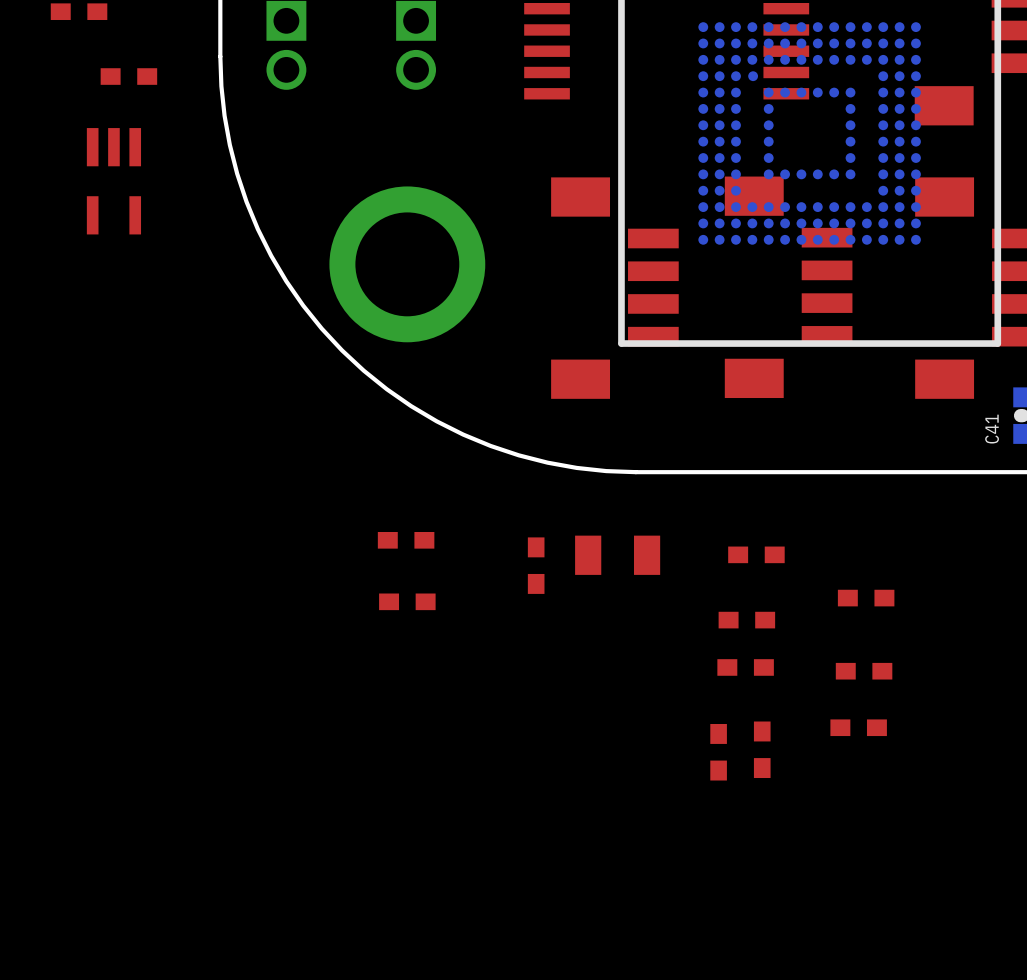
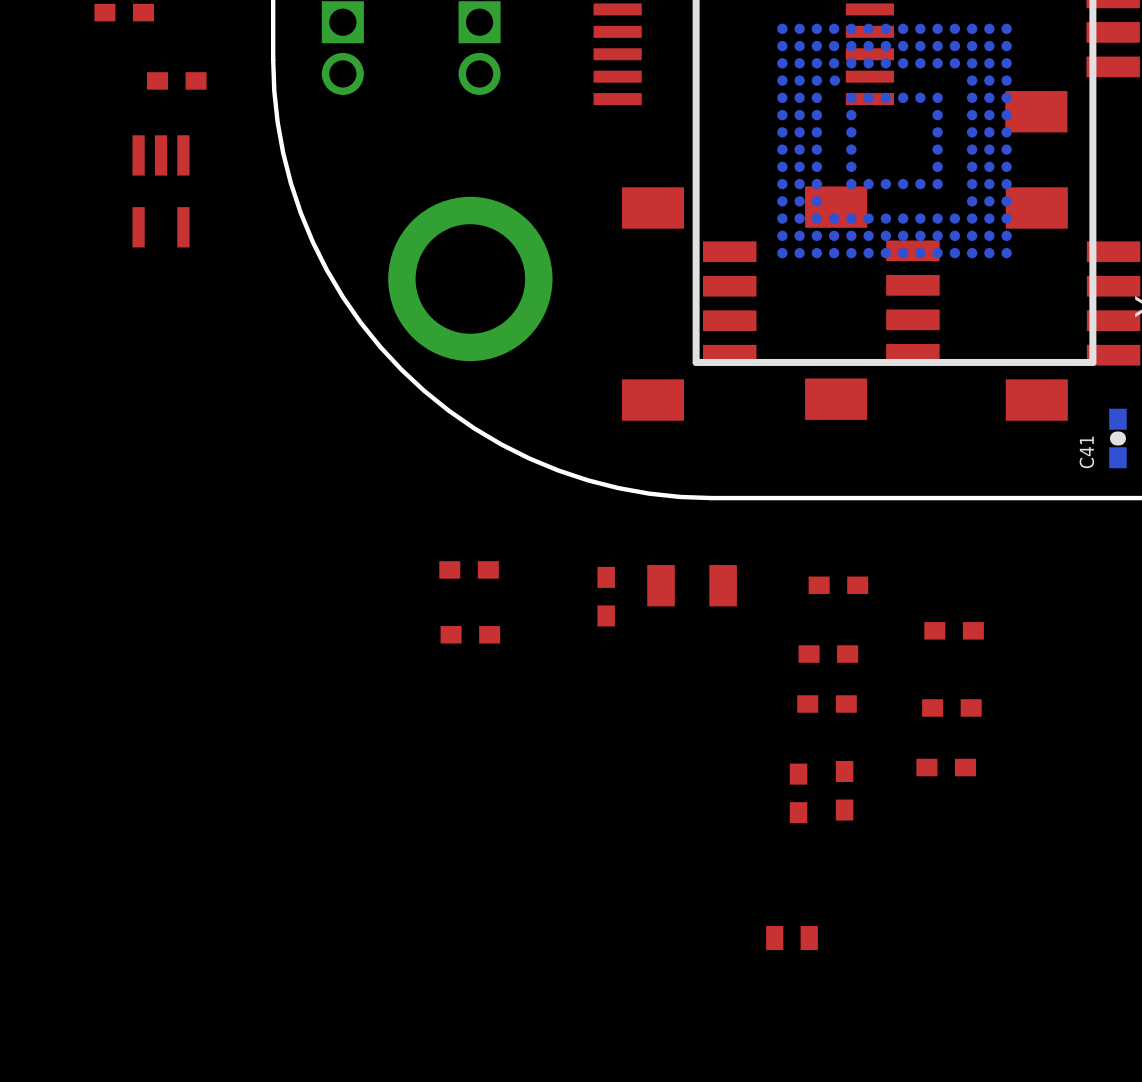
part: none -> (791, 937)

